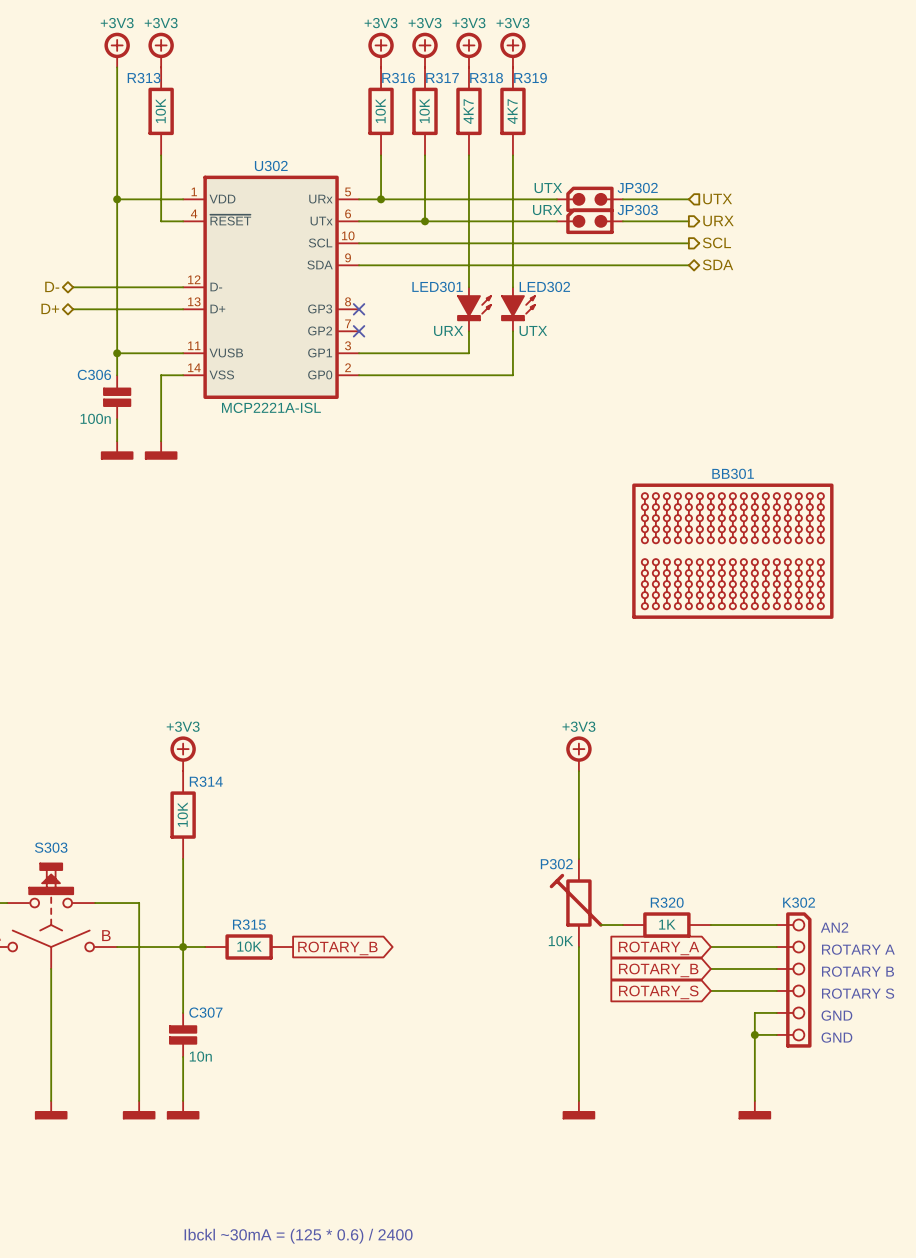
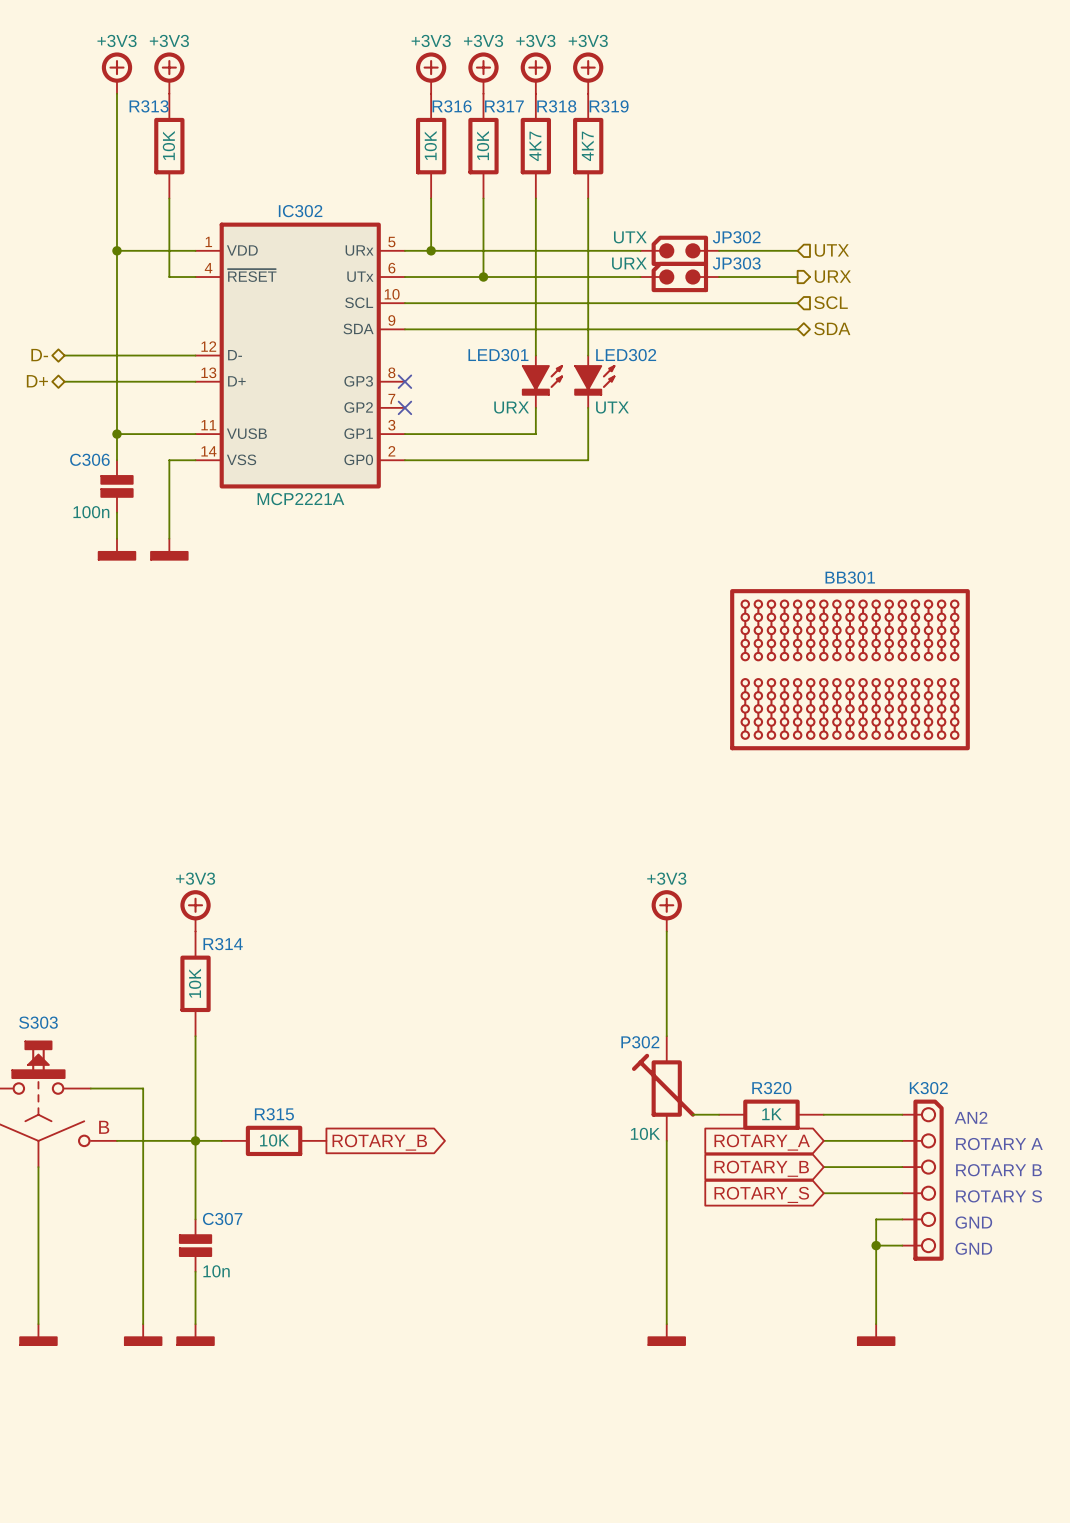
U302 name: U302 (271, 165) -> IC302 (300, 211)
hierarchical label shape: output (716, 242) -> input (831, 302)
U302 text: MCP2221A-ISL (271, 407) -> MCP2221A (300, 499)
text: Ibckl ~30mA = (125 * 0.6) / 2400 (298, 1236) -> none

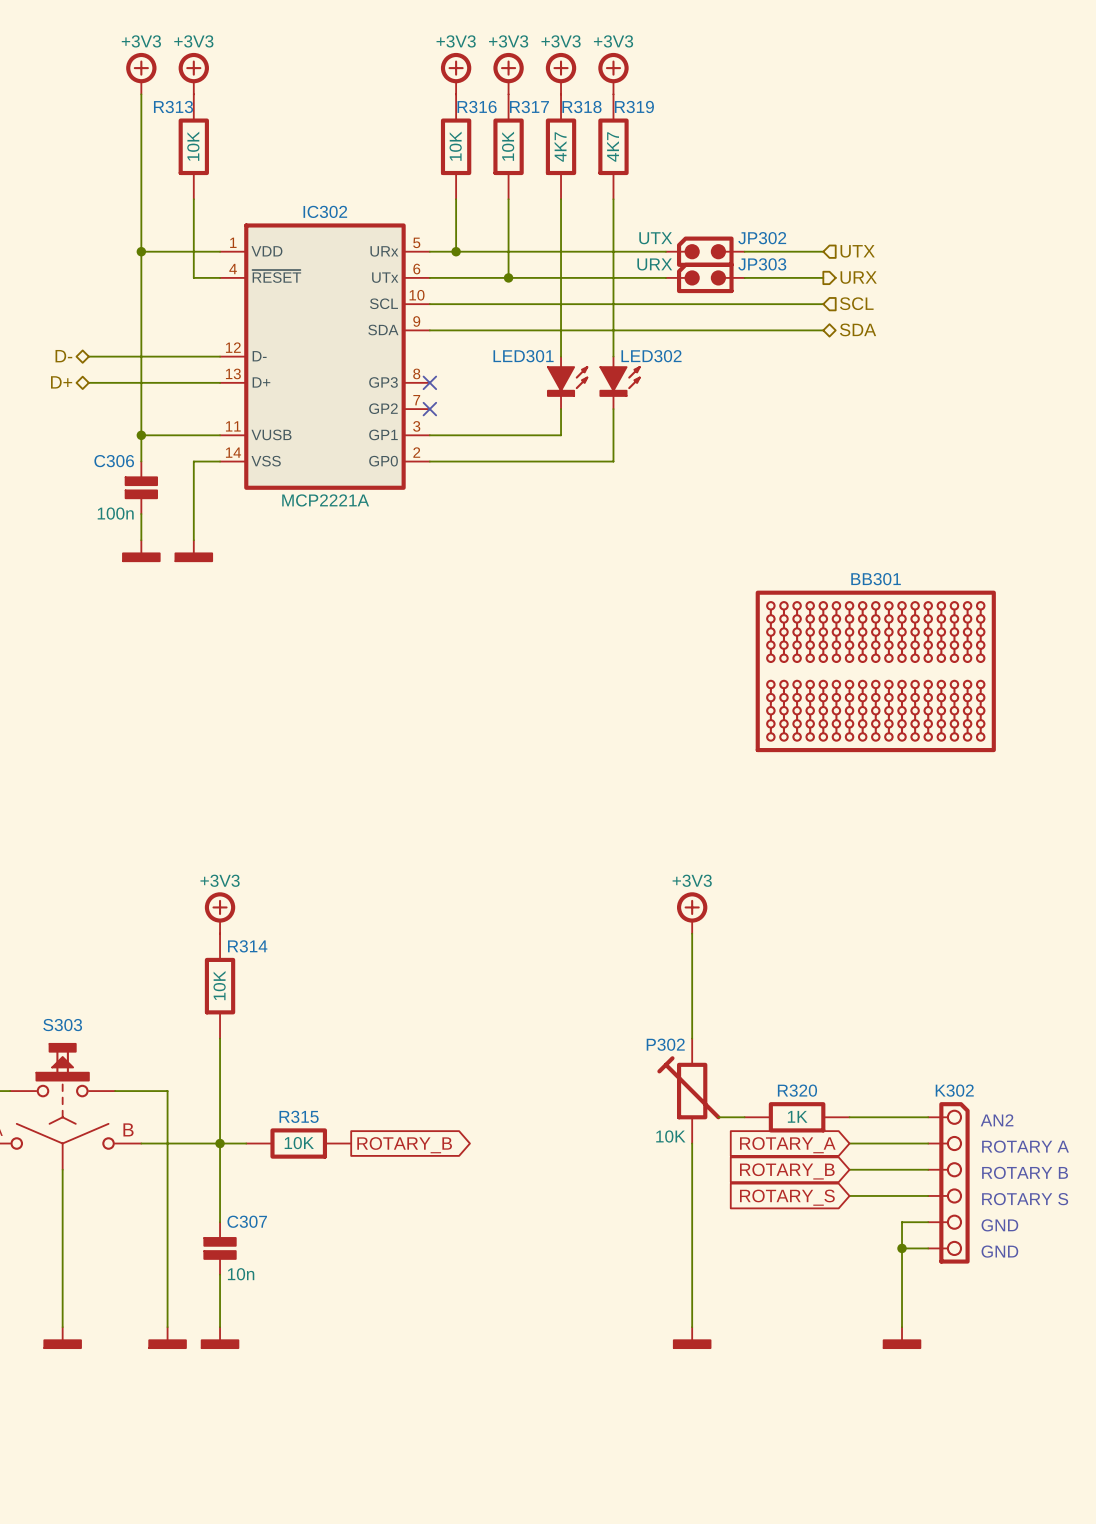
LED301 value: URX (511, 407) -> none
LED302 value: UTX (612, 407) -> none

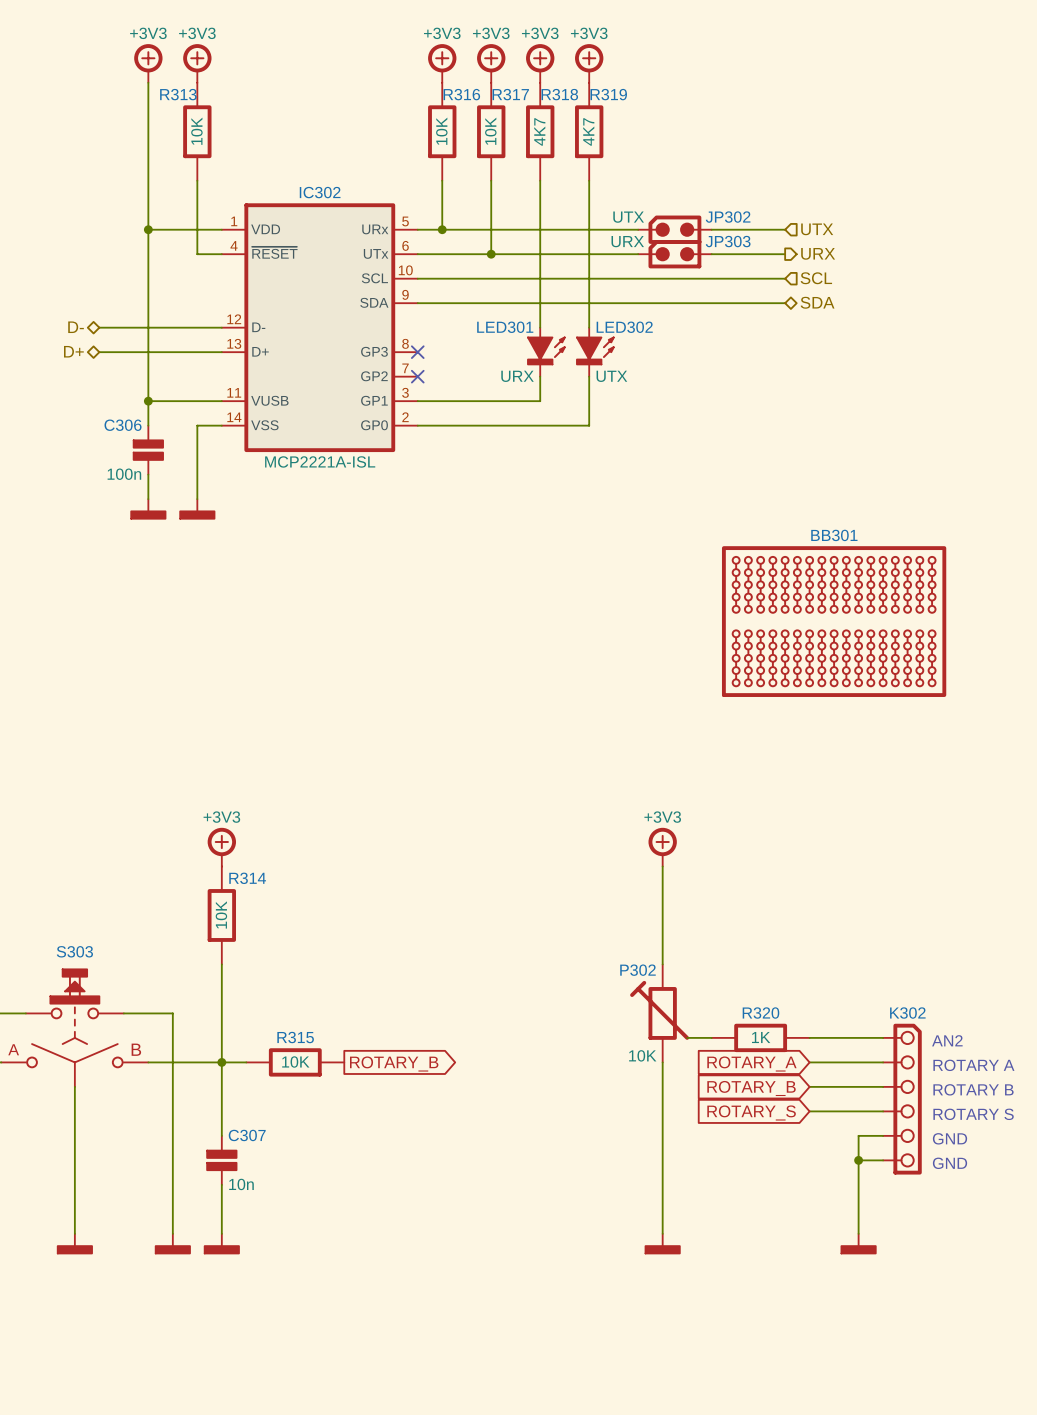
LED301 value: none -> URX (517, 376)
LED302 value: none -> UTX (611, 376)
IC302 text: MCP2221A (325, 500) -> MCP2221A-ISL (320, 461)

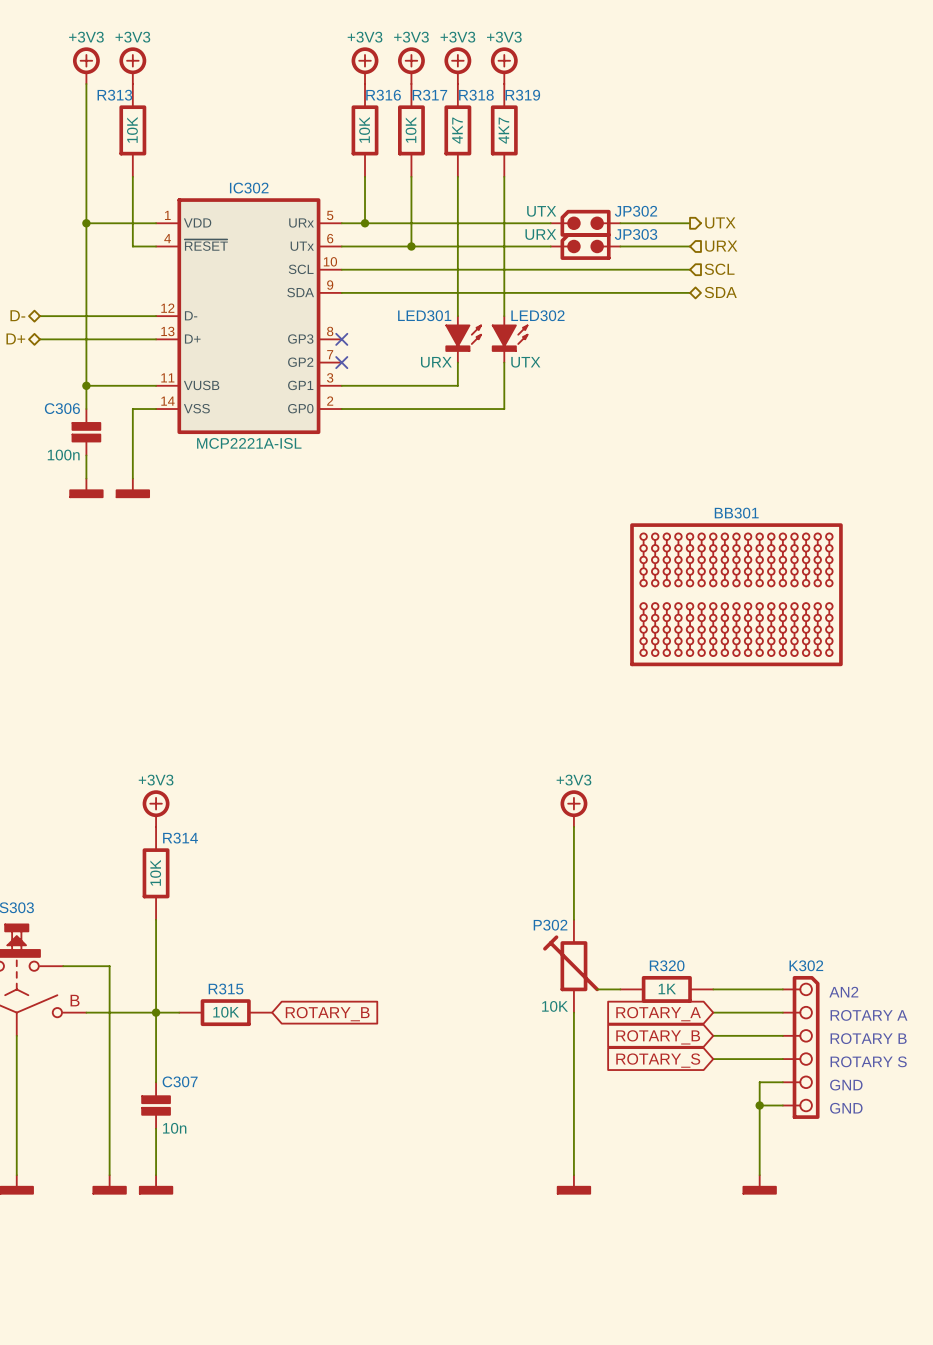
hierarchical label shape: input (817, 229) -> output (720, 222)
hierarchical label shape: output (818, 253) -> input (721, 246)
global label shape: output (394, 1064) -> input (327, 1014)

